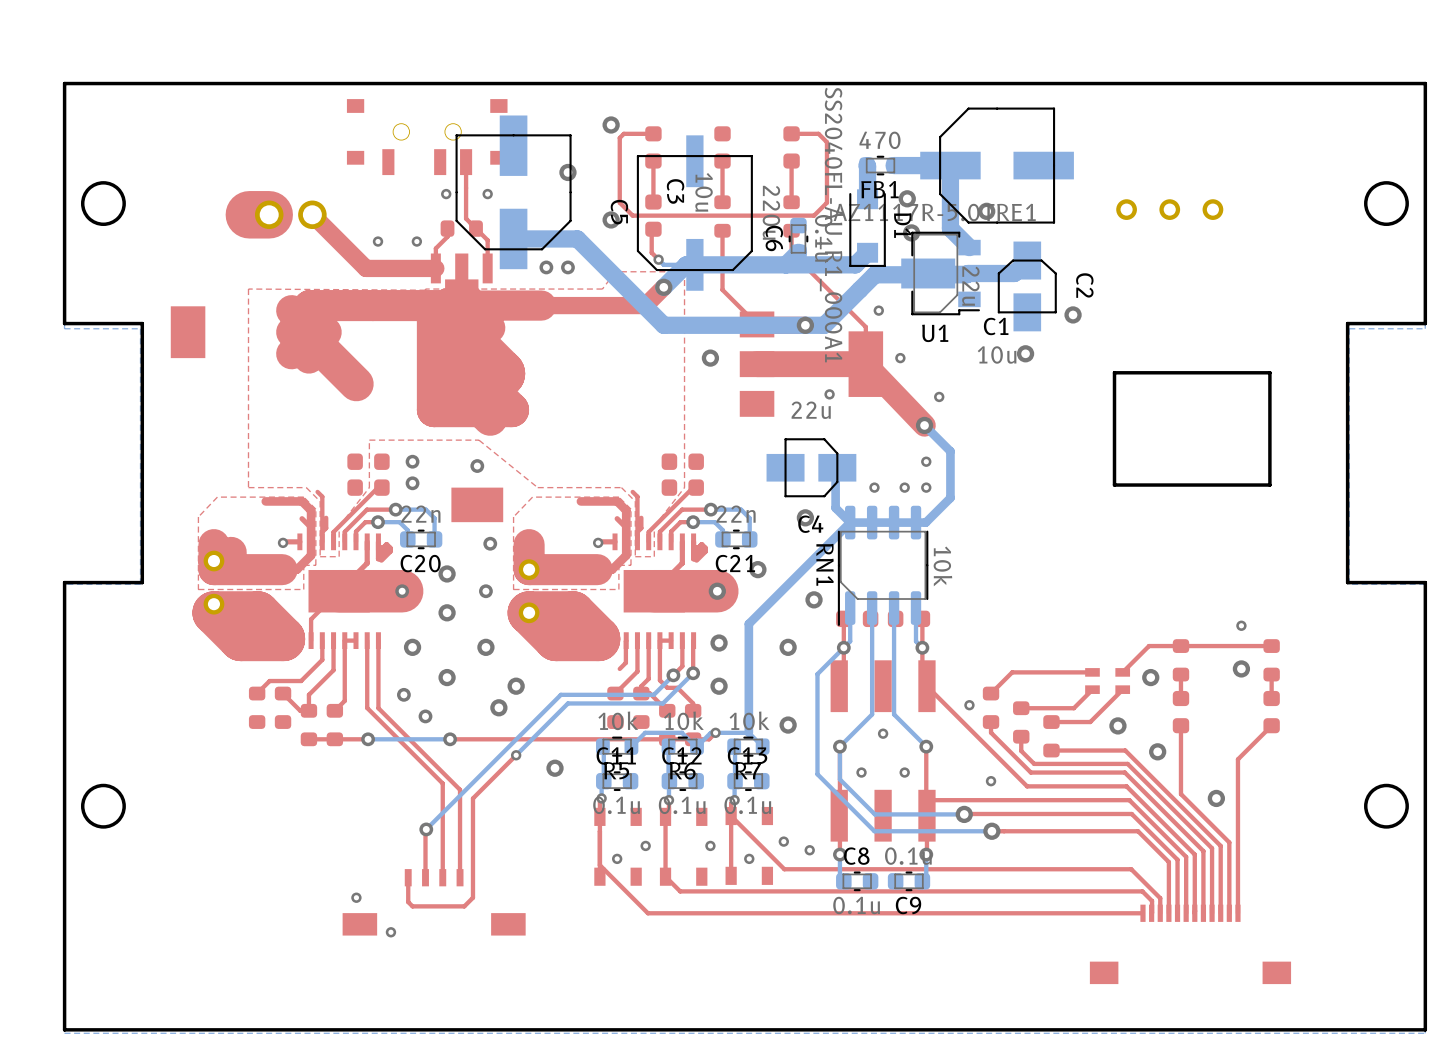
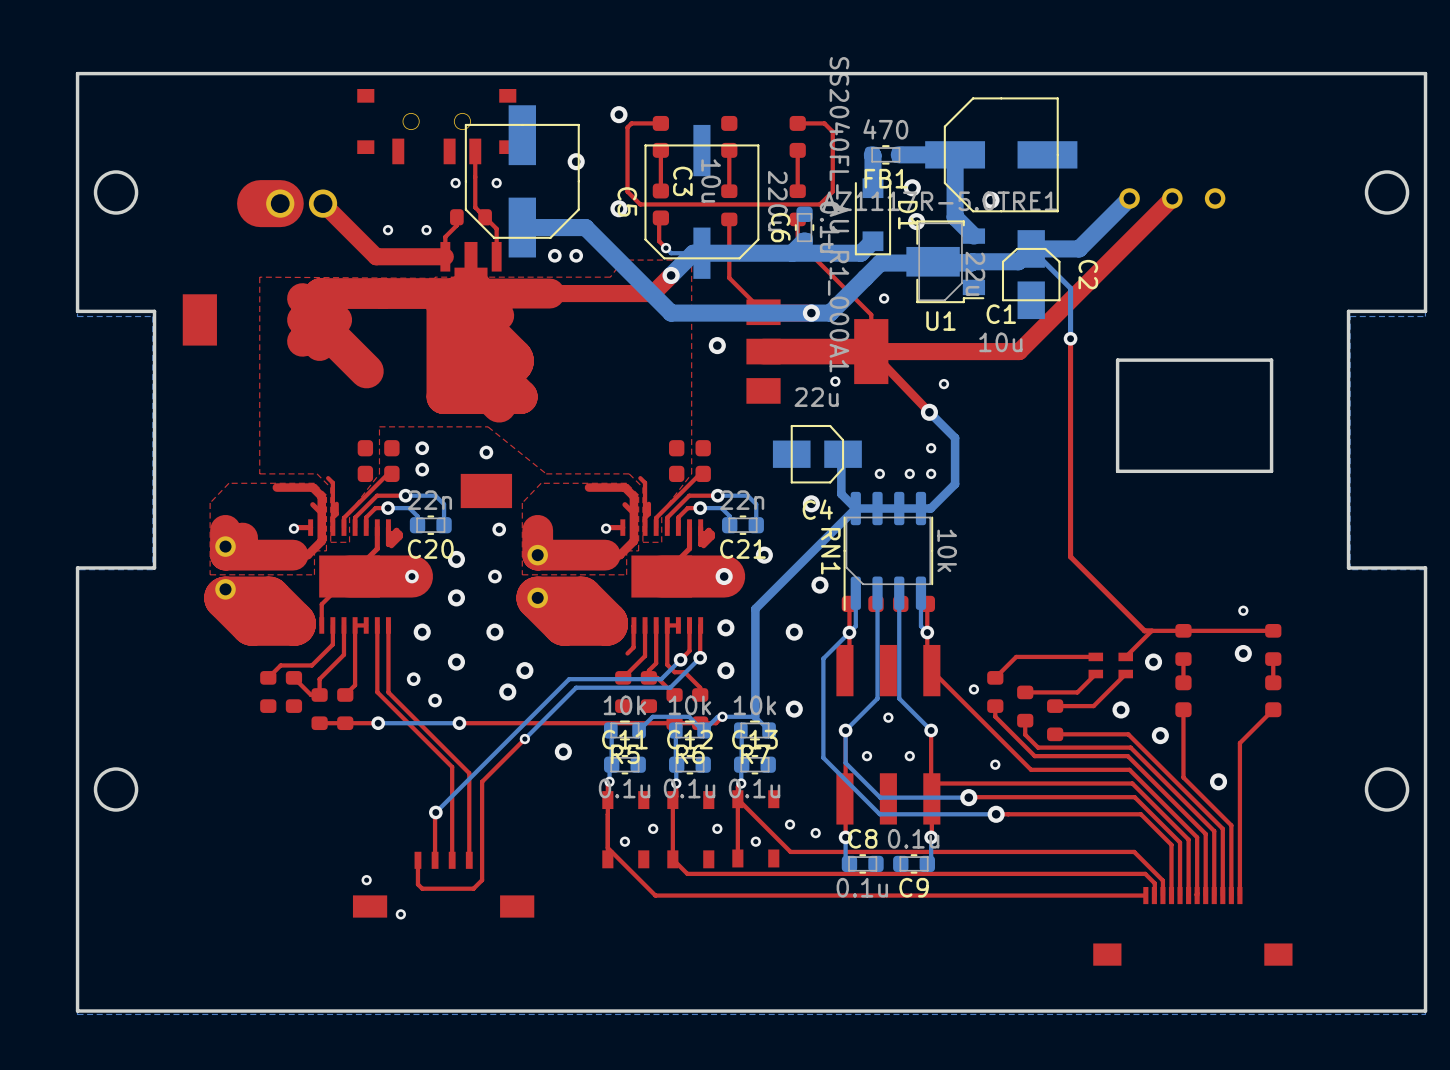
bottom track: none -> (1129, 198) (1079, 248) (1031, 248) (1070, 288) (1070, 338)
top track: none -> (1172, 198) (1019, 351) (871, 351)
via: (1073, 314) -> none
top track: none -> (1070, 338) (1070, 556) (1144, 630) (1151, 630)
via: none -> (1070, 338)
via: (1025, 353) -> none
via: (900, 358) -> none
top track width: thick (865, 364) (924, 425) -> thin (871, 351) (929, 412)

